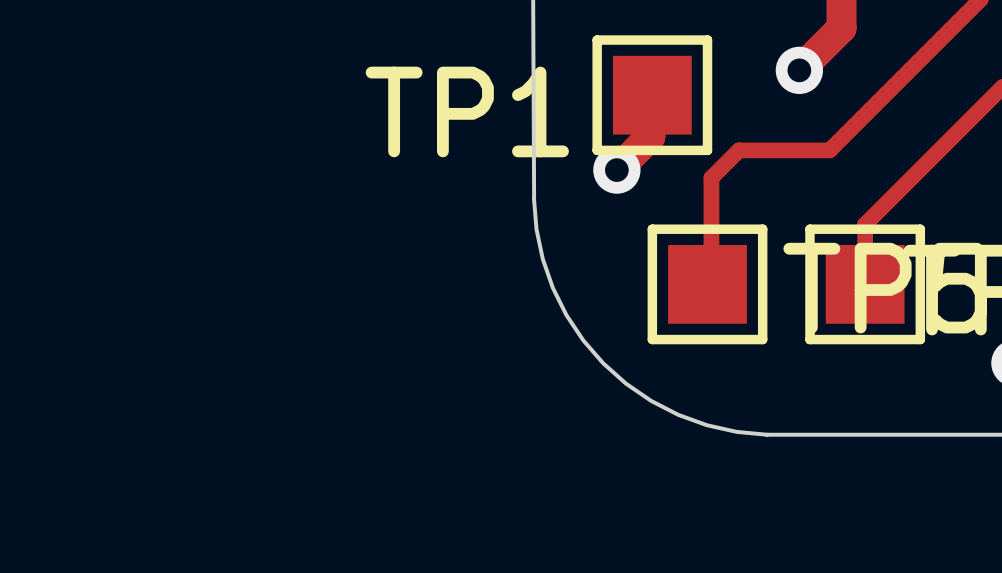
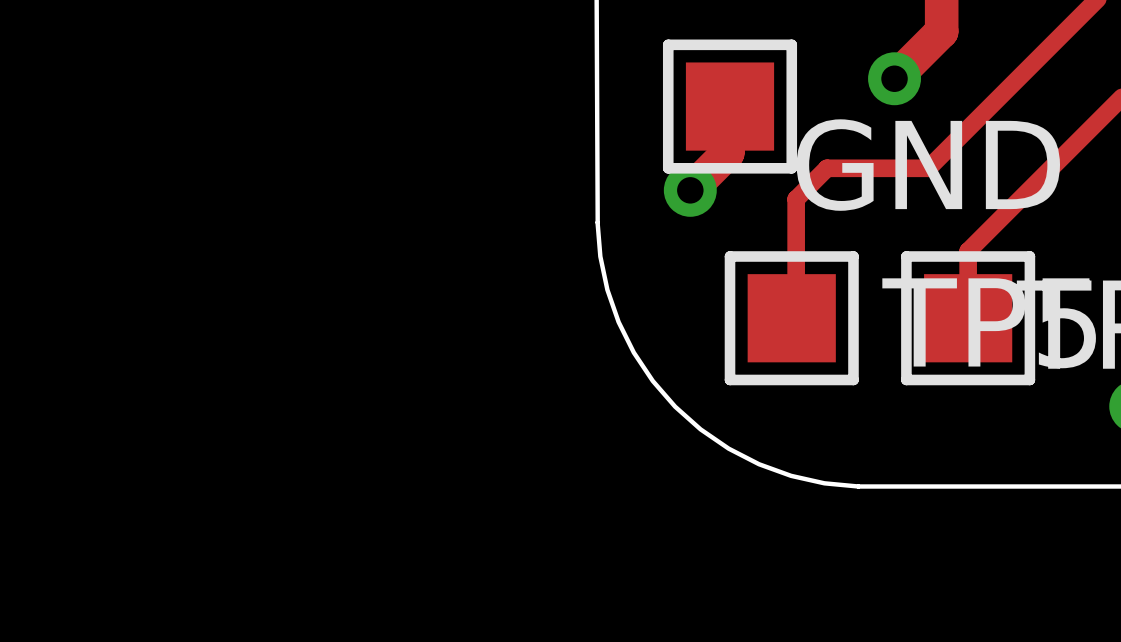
TP1 name: TP1 (467, 111) -> GND (928, 165)

